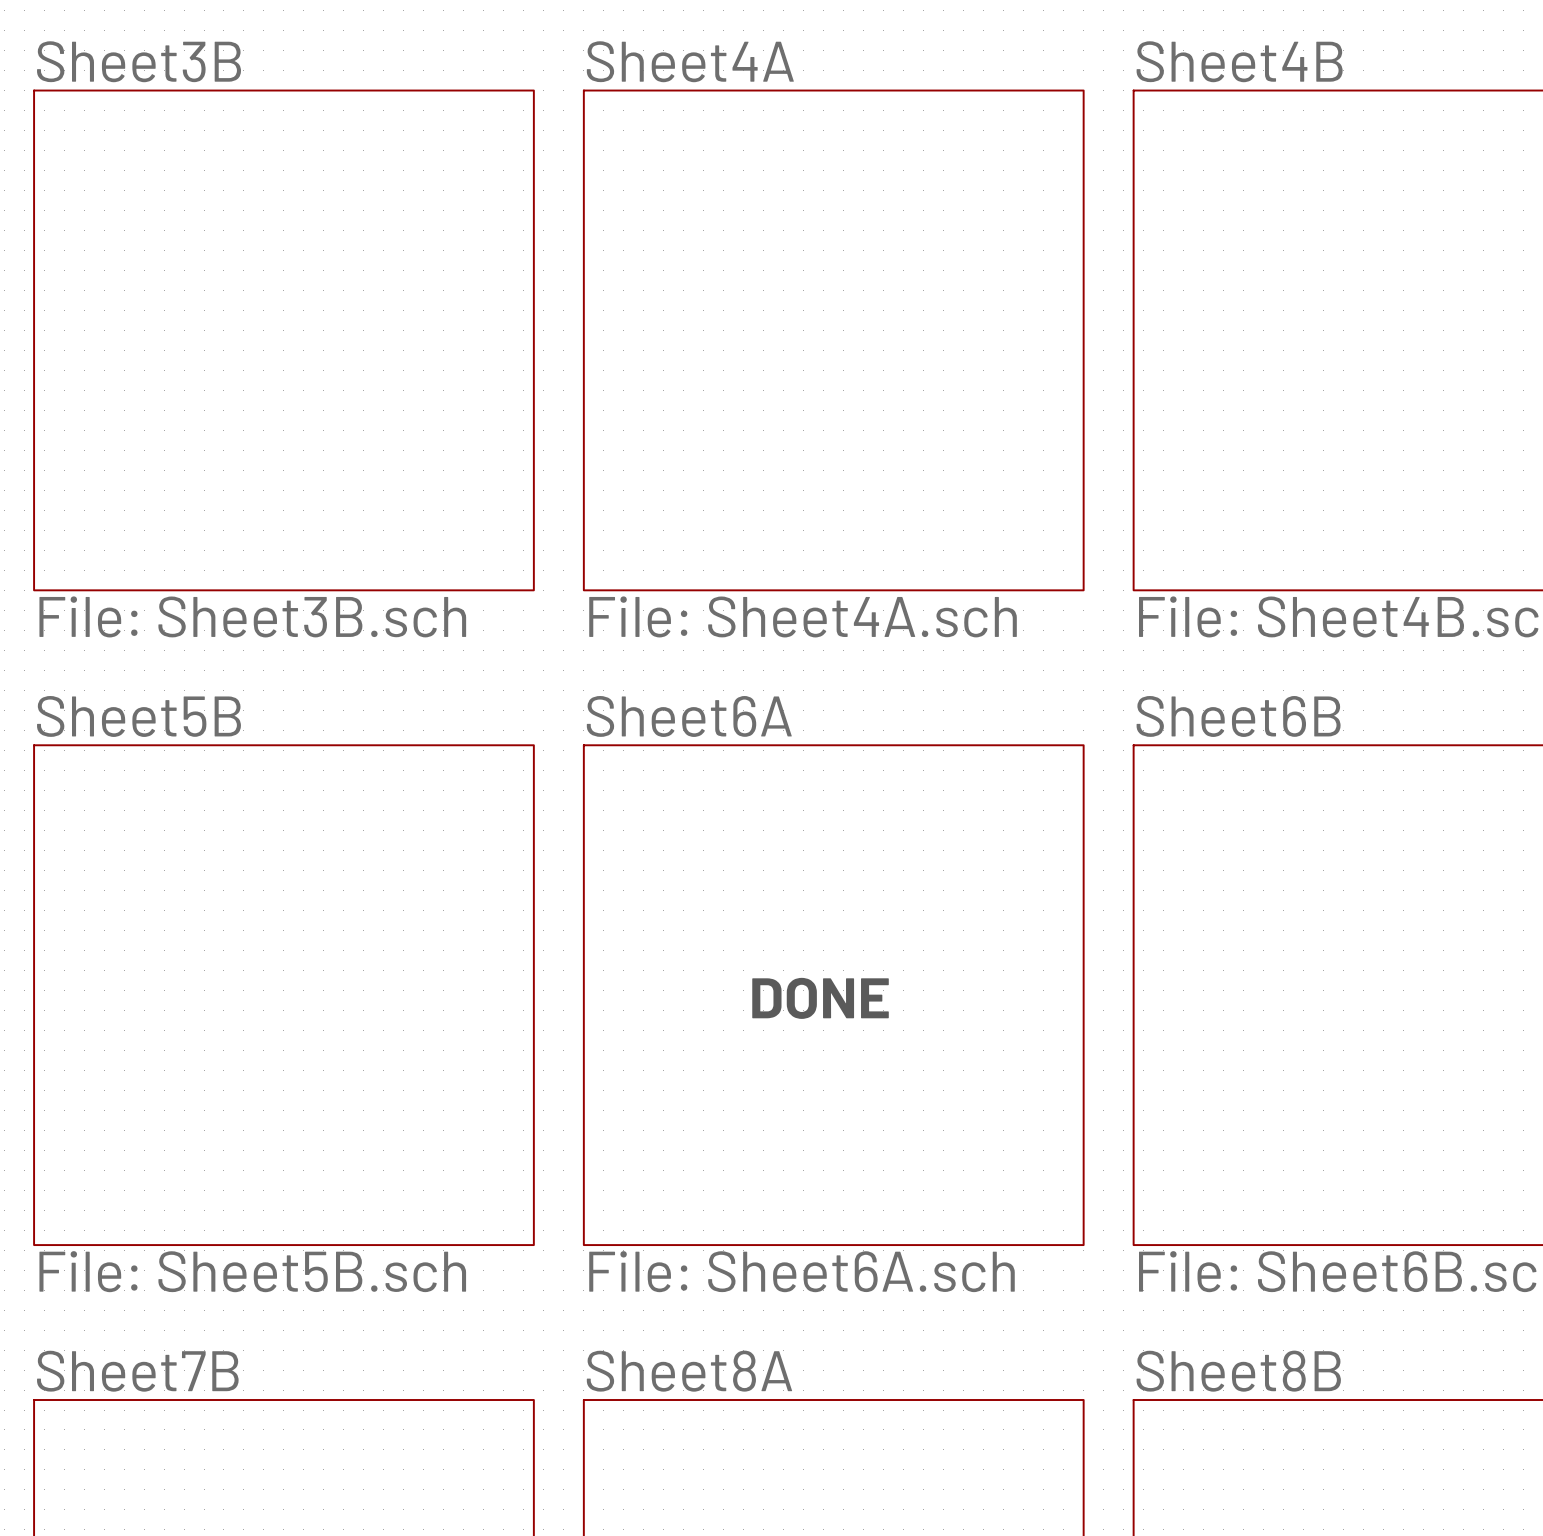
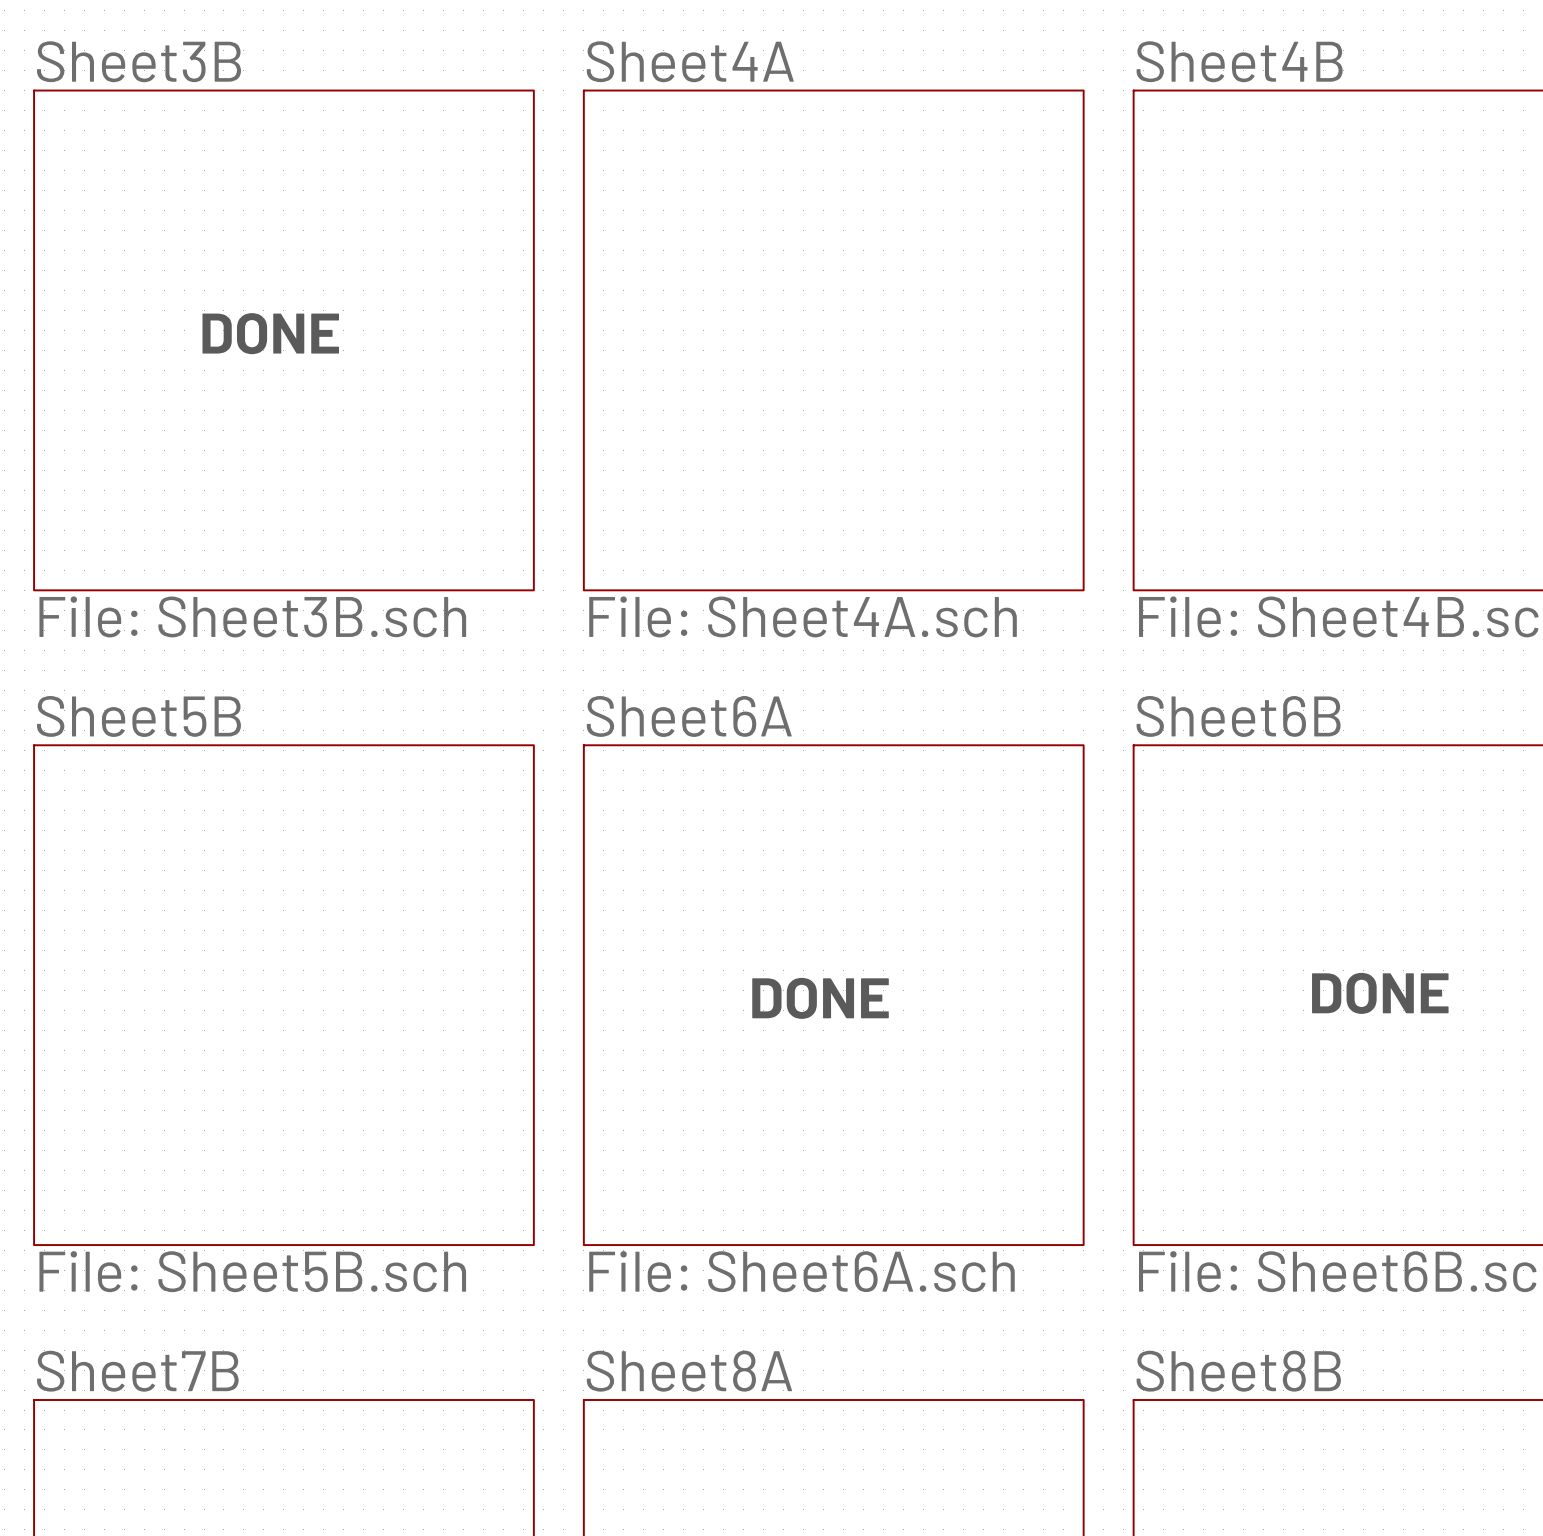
text: none -> DONE (270, 333)
text: none -> DONE (1380, 993)

